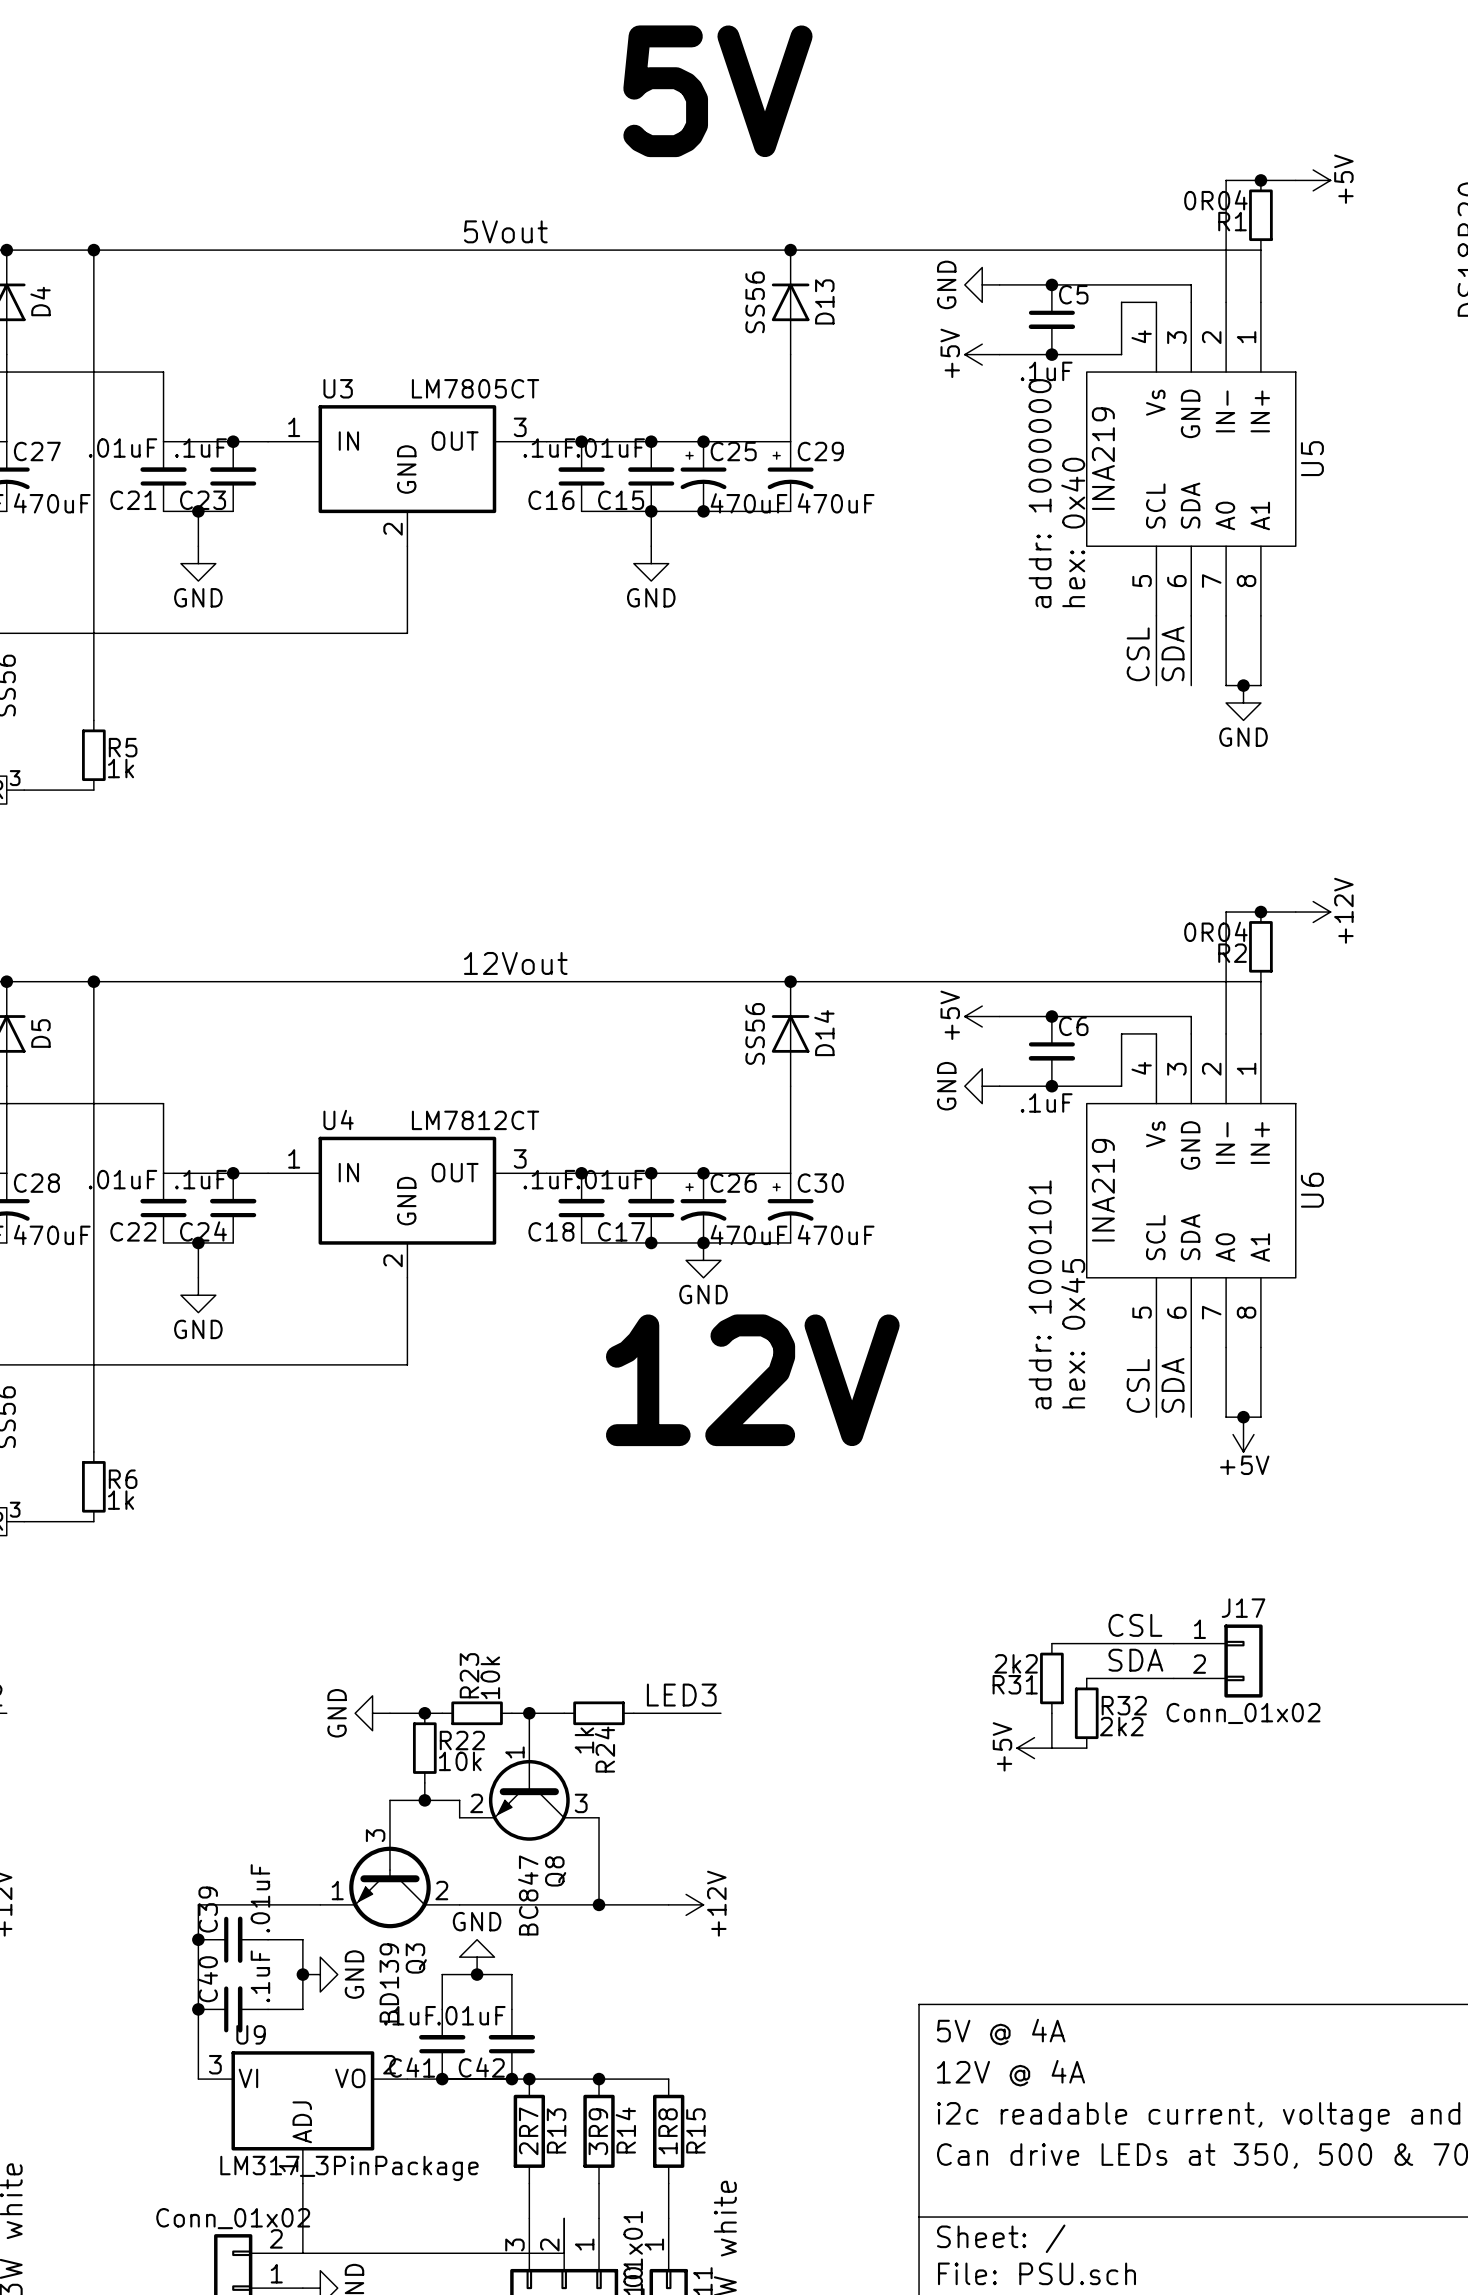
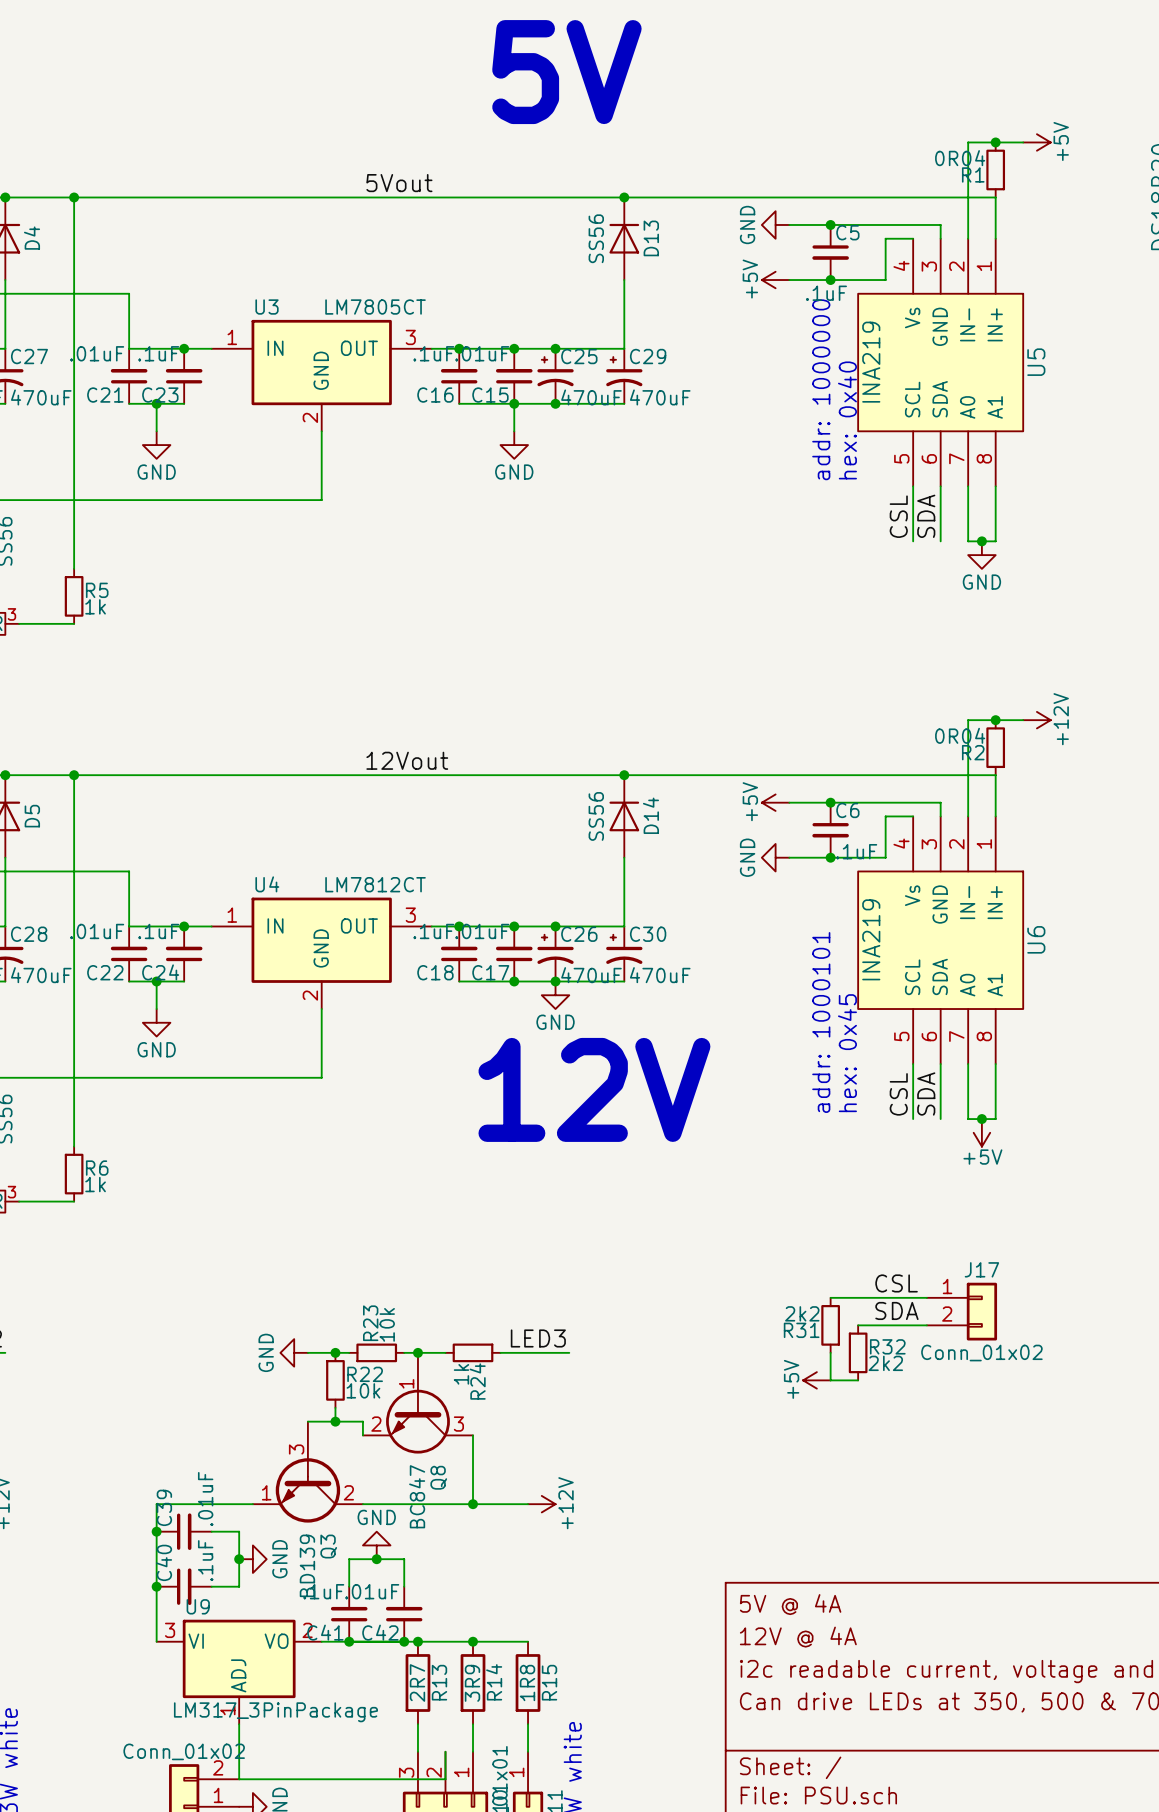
C6 value position: .1uF (1046, 1102) -> .1uF (856, 851)

